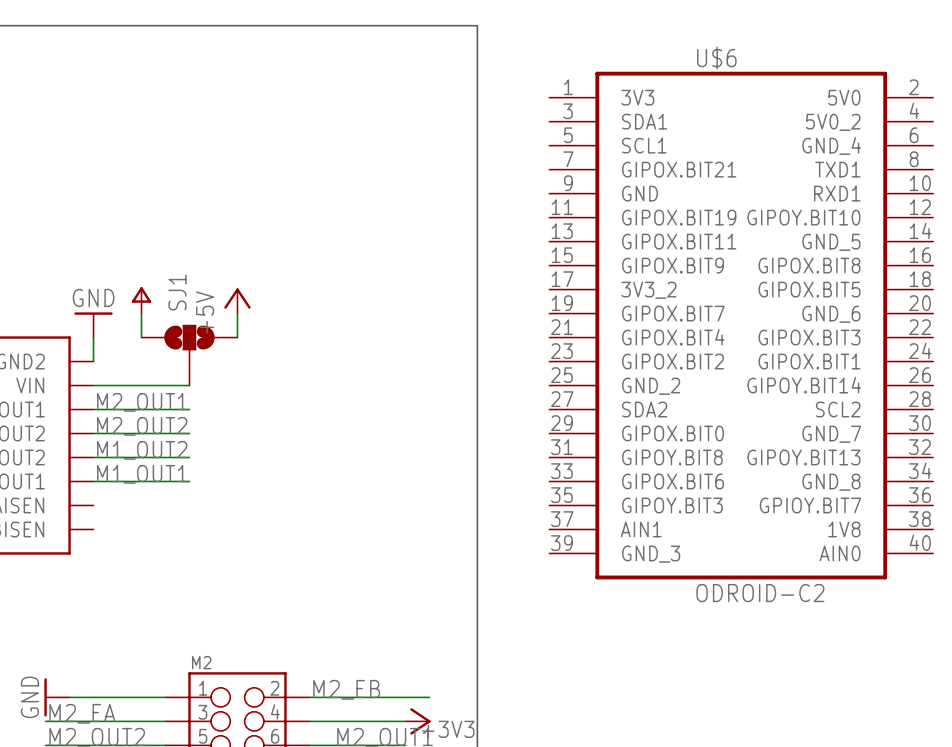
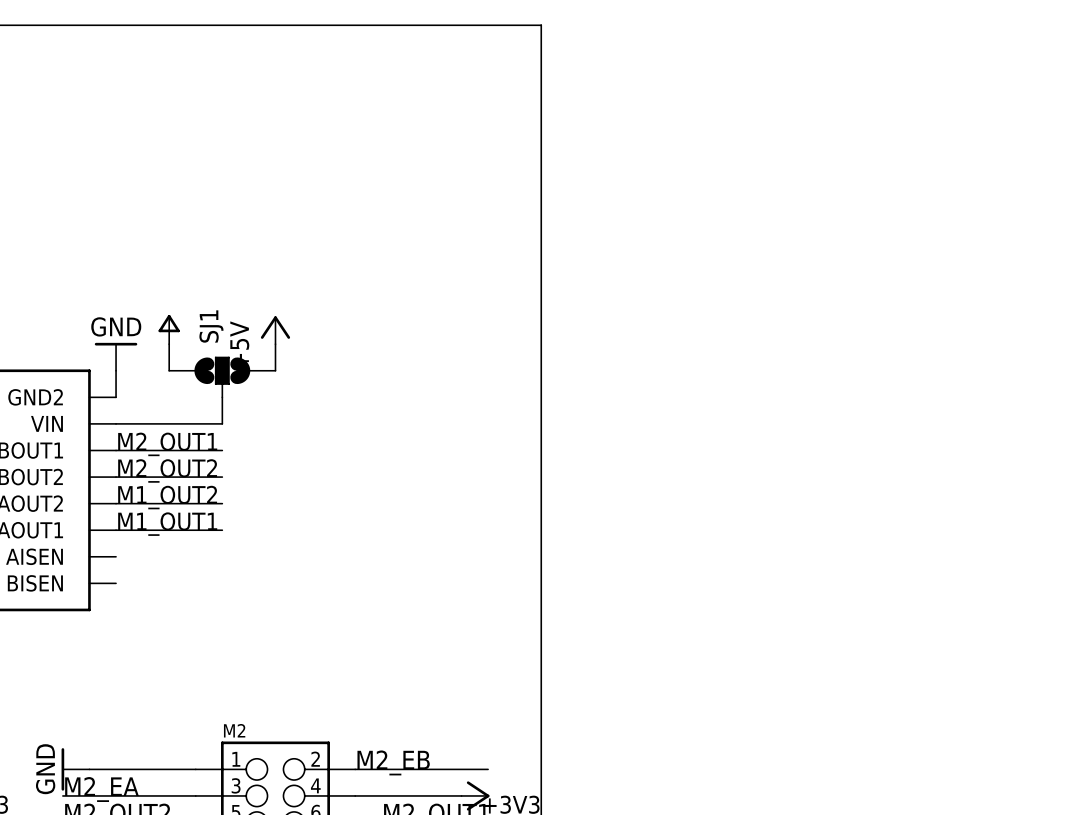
U$6: ODROID-C2 (741, 325) -> none

